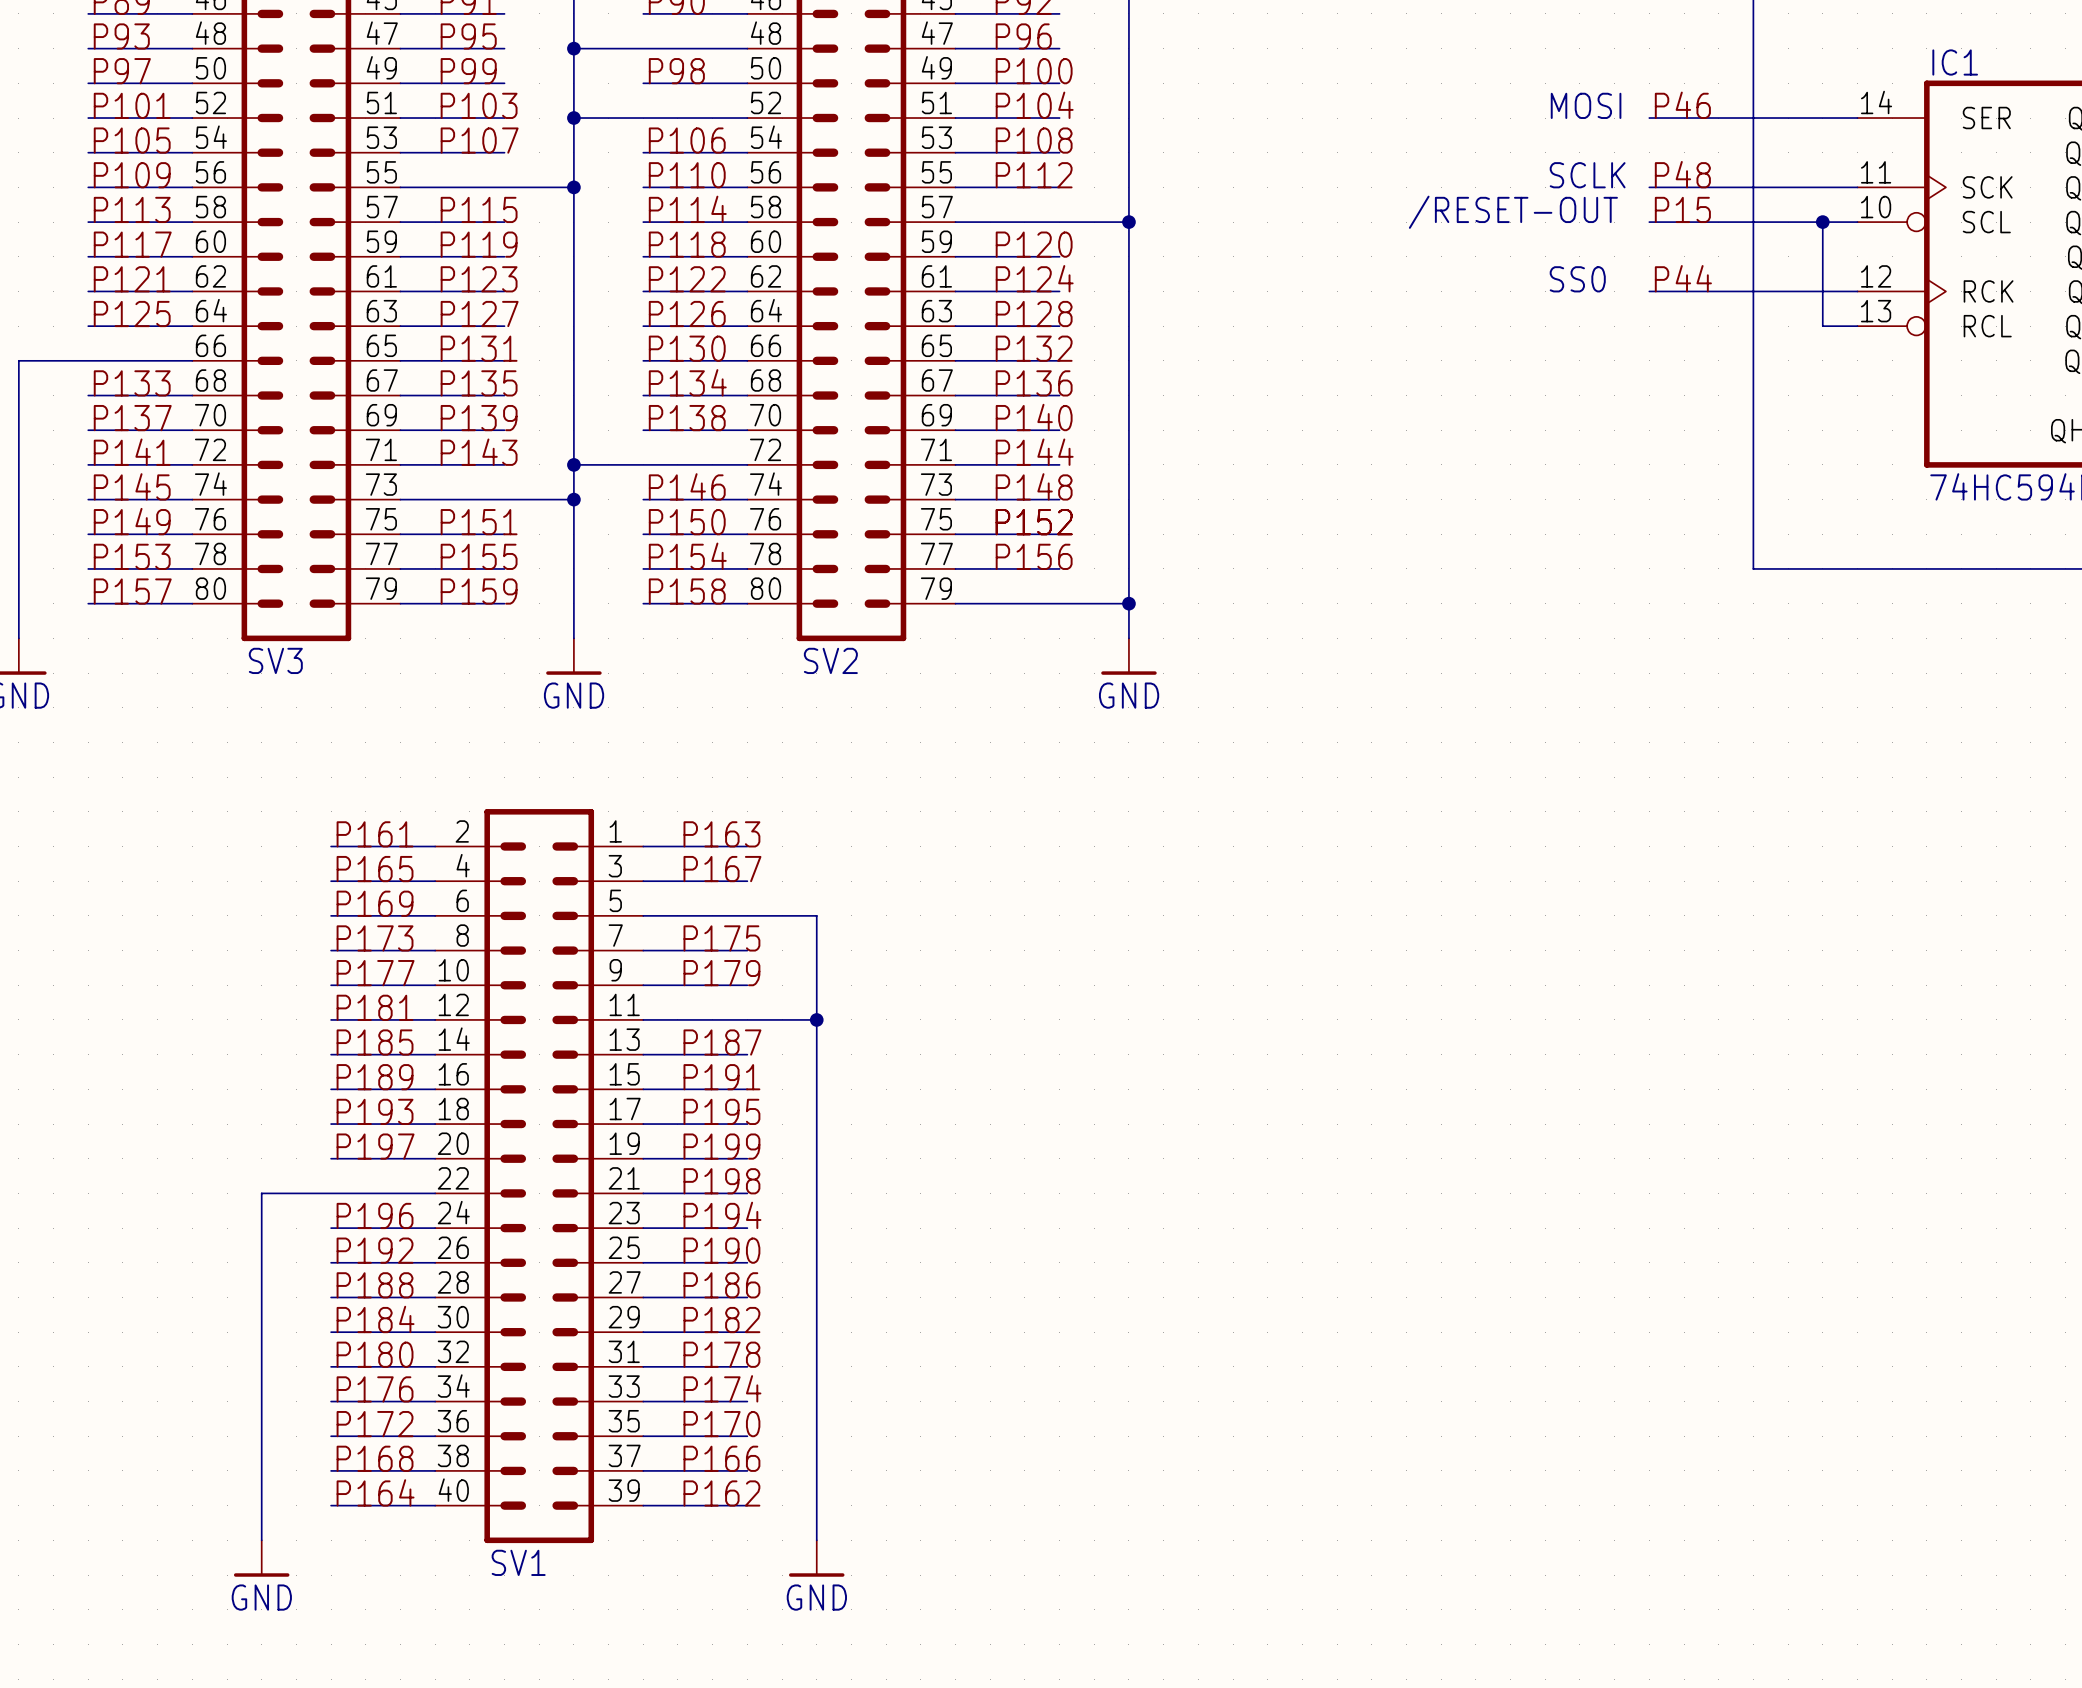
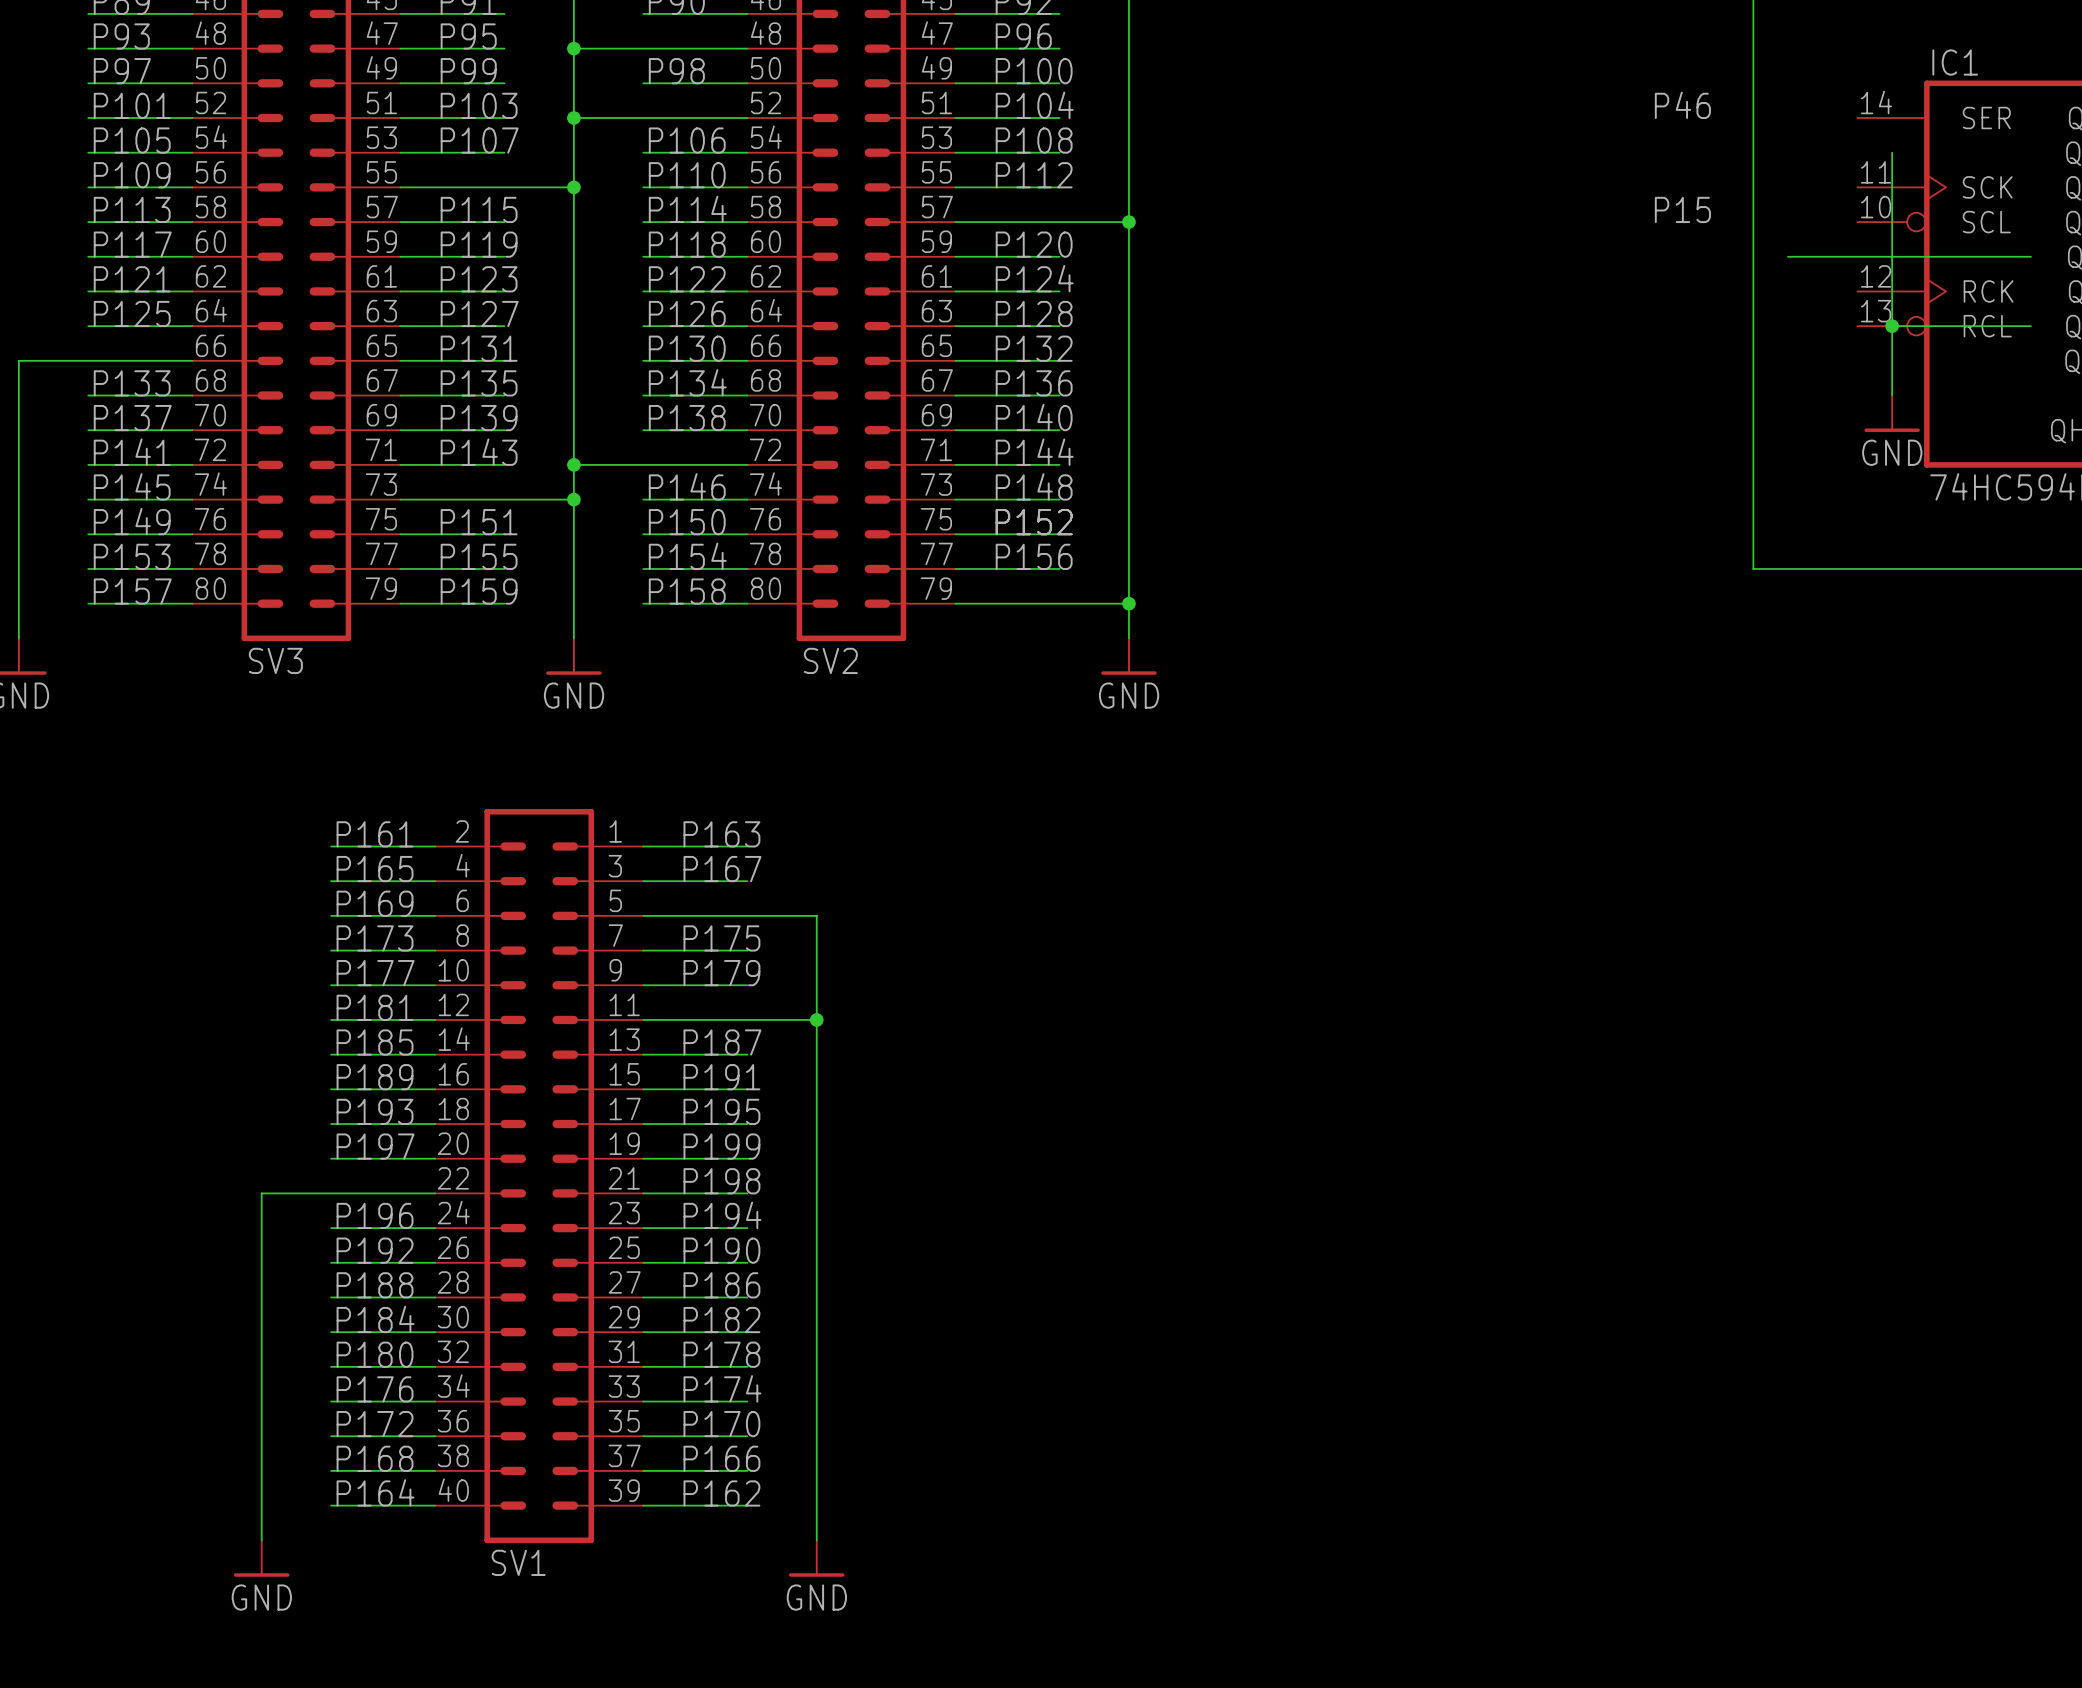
text: MOSI (1586, 105) -> none
wire: (1649, 118) (1857, 118) -> none
wire: none -> (1892, 152) (1892, 395)
label: P48 (1682, 174) -> none
text: SCLK (1587, 175) -> none
wire: (1649, 187) (1857, 187) -> none
text: /RESET-OUT (1513, 212) -> none
wire: (1649, 222) (1857, 222) -> none
wire: (1822, 222) (1822, 326) (1857, 326) -> none
junction: (1822, 222) -> none
wire: none -> (1788, 256) (2030, 256)
label: P44 (1683, 278) -> none
text: SS0 (1577, 279) -> none
wire: (1649, 291) (1857, 291) -> none
wire: none -> (1892, 326) (2030, 326)
junction: none -> (1892, 326)
power symbol: none -> GND (1892, 413)

